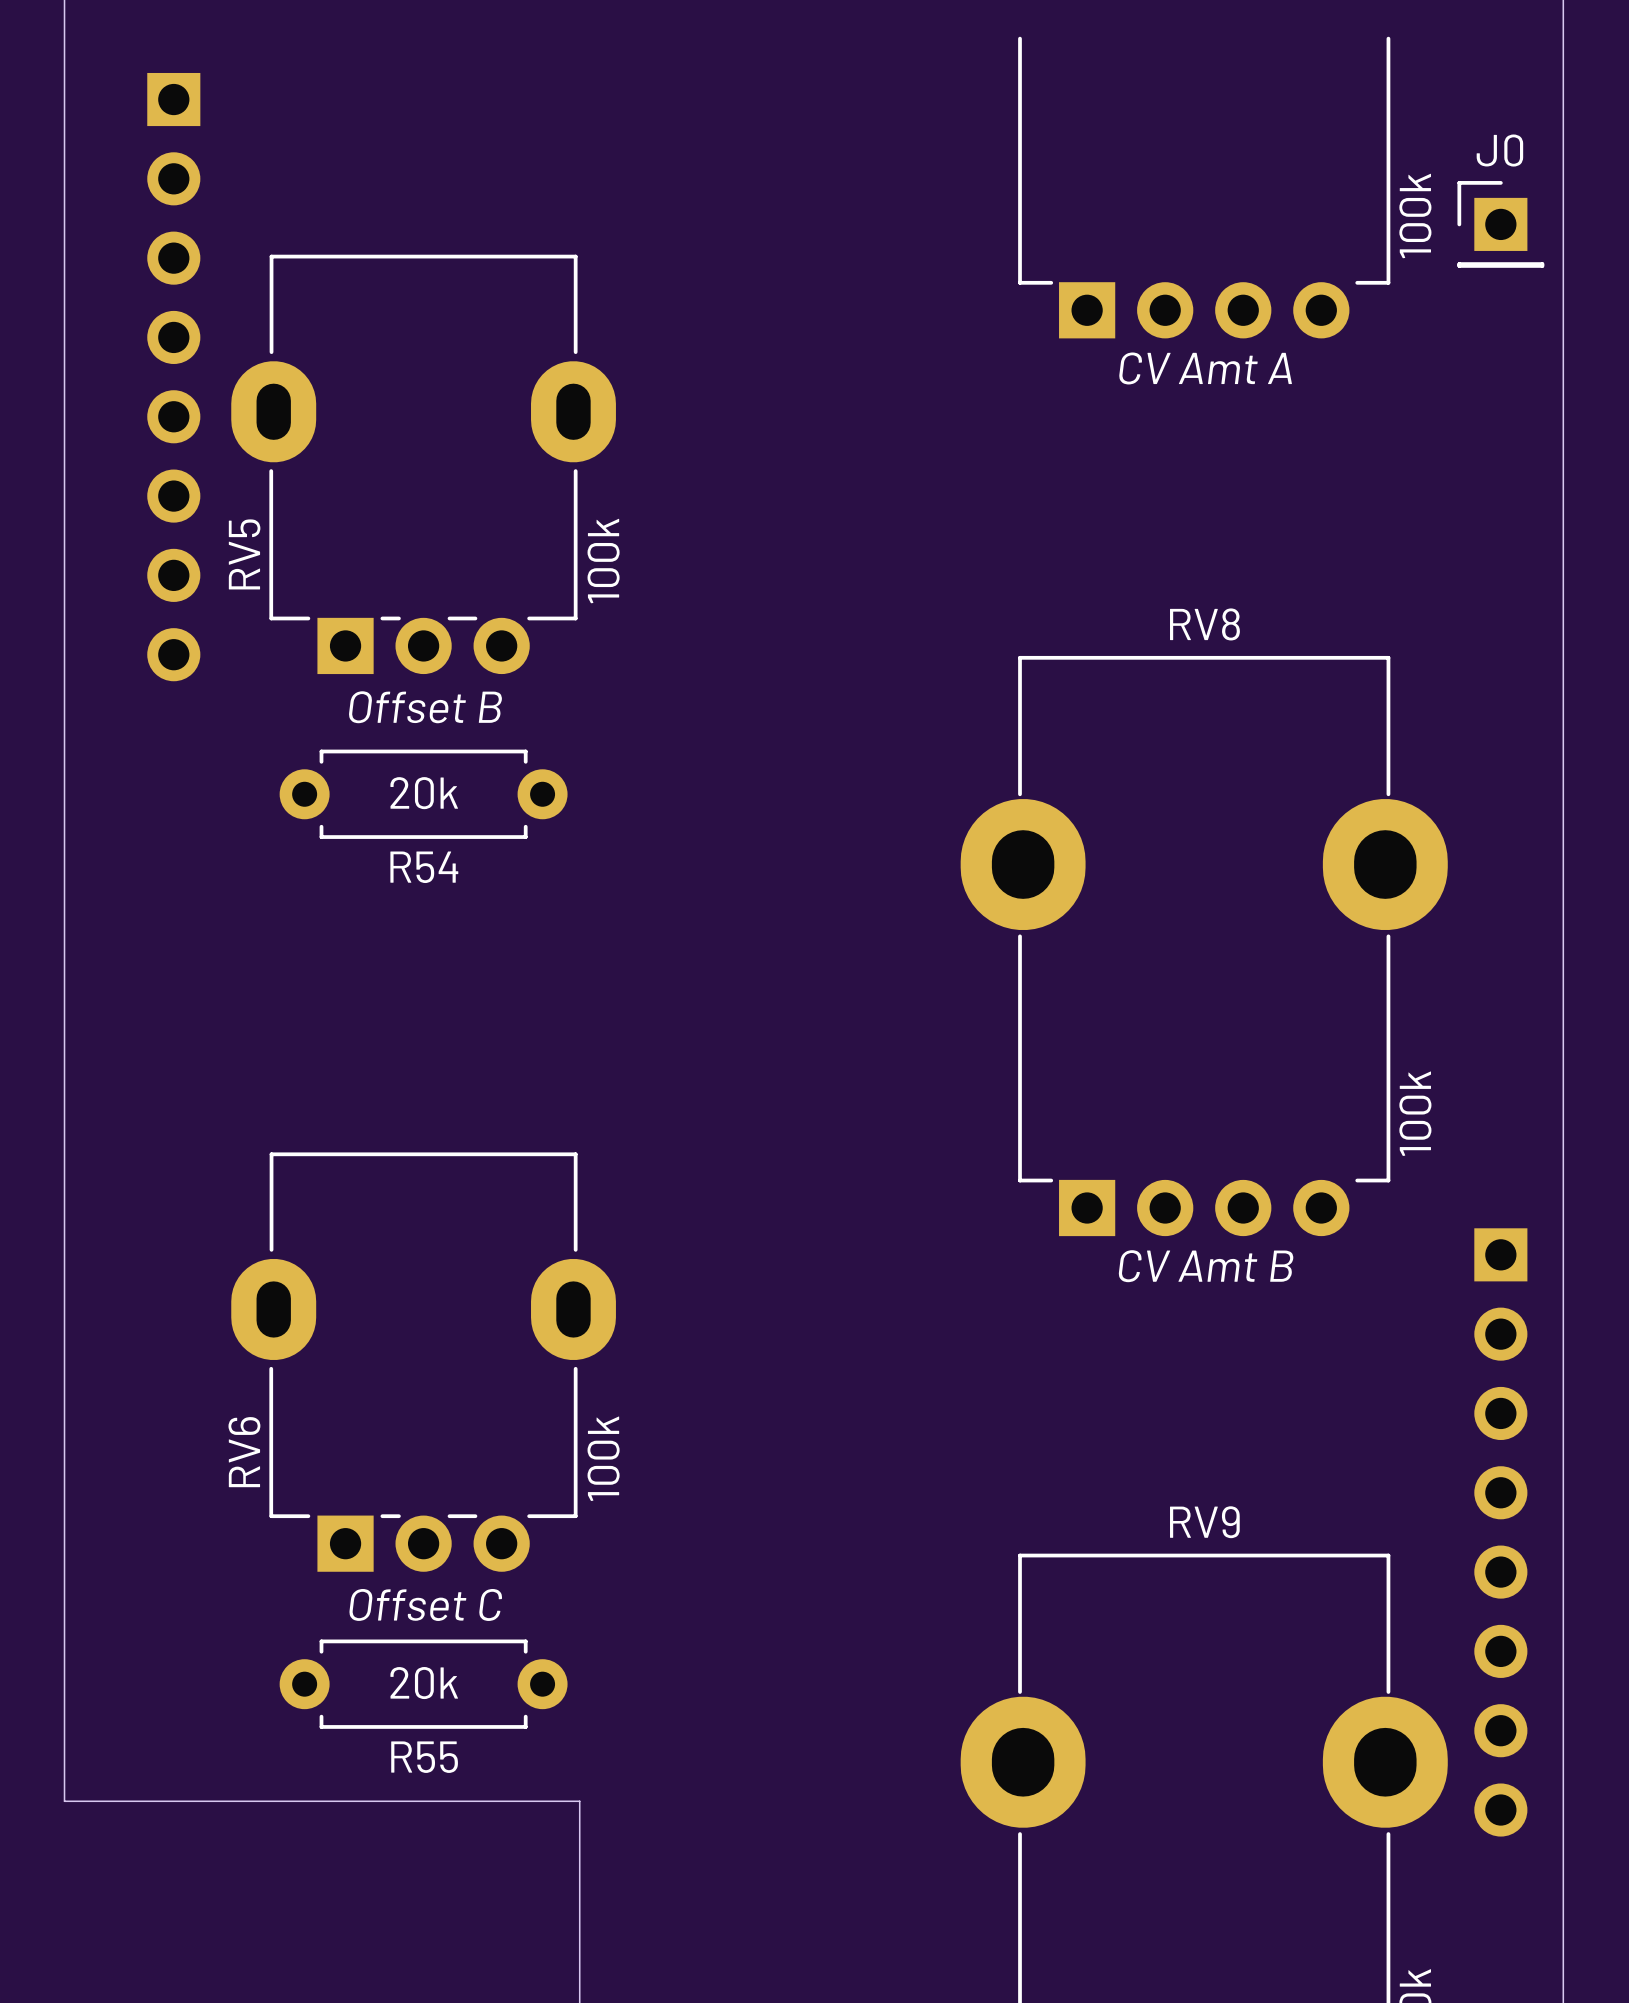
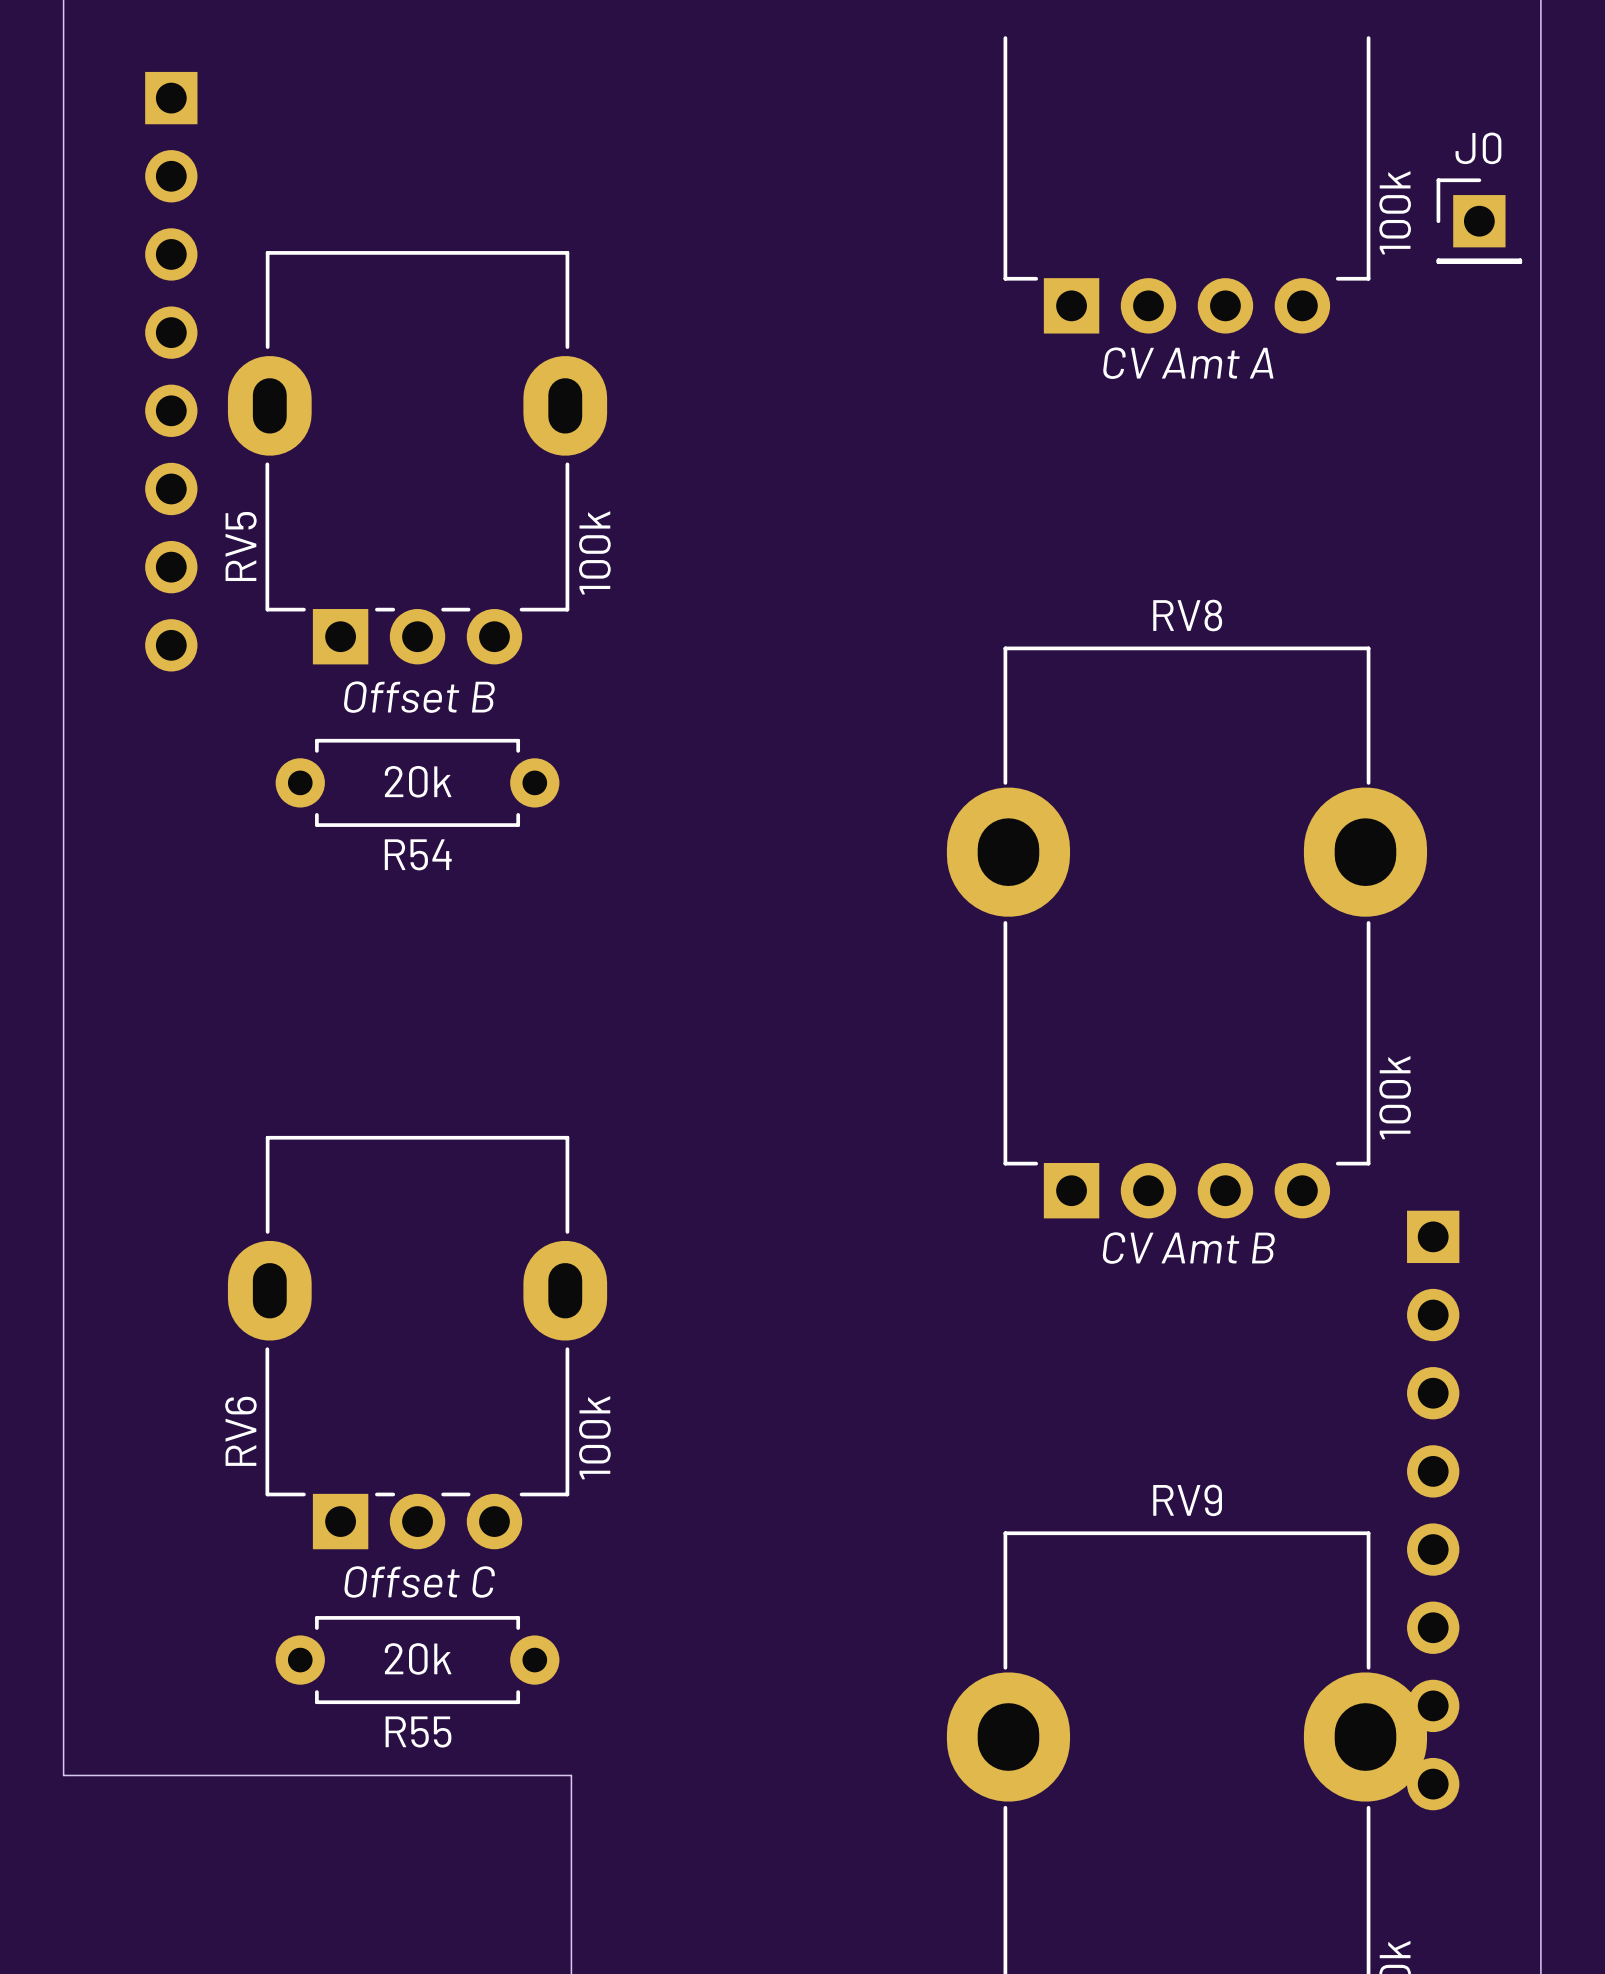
part position: (1500, 1532) -> (1433, 1510)

